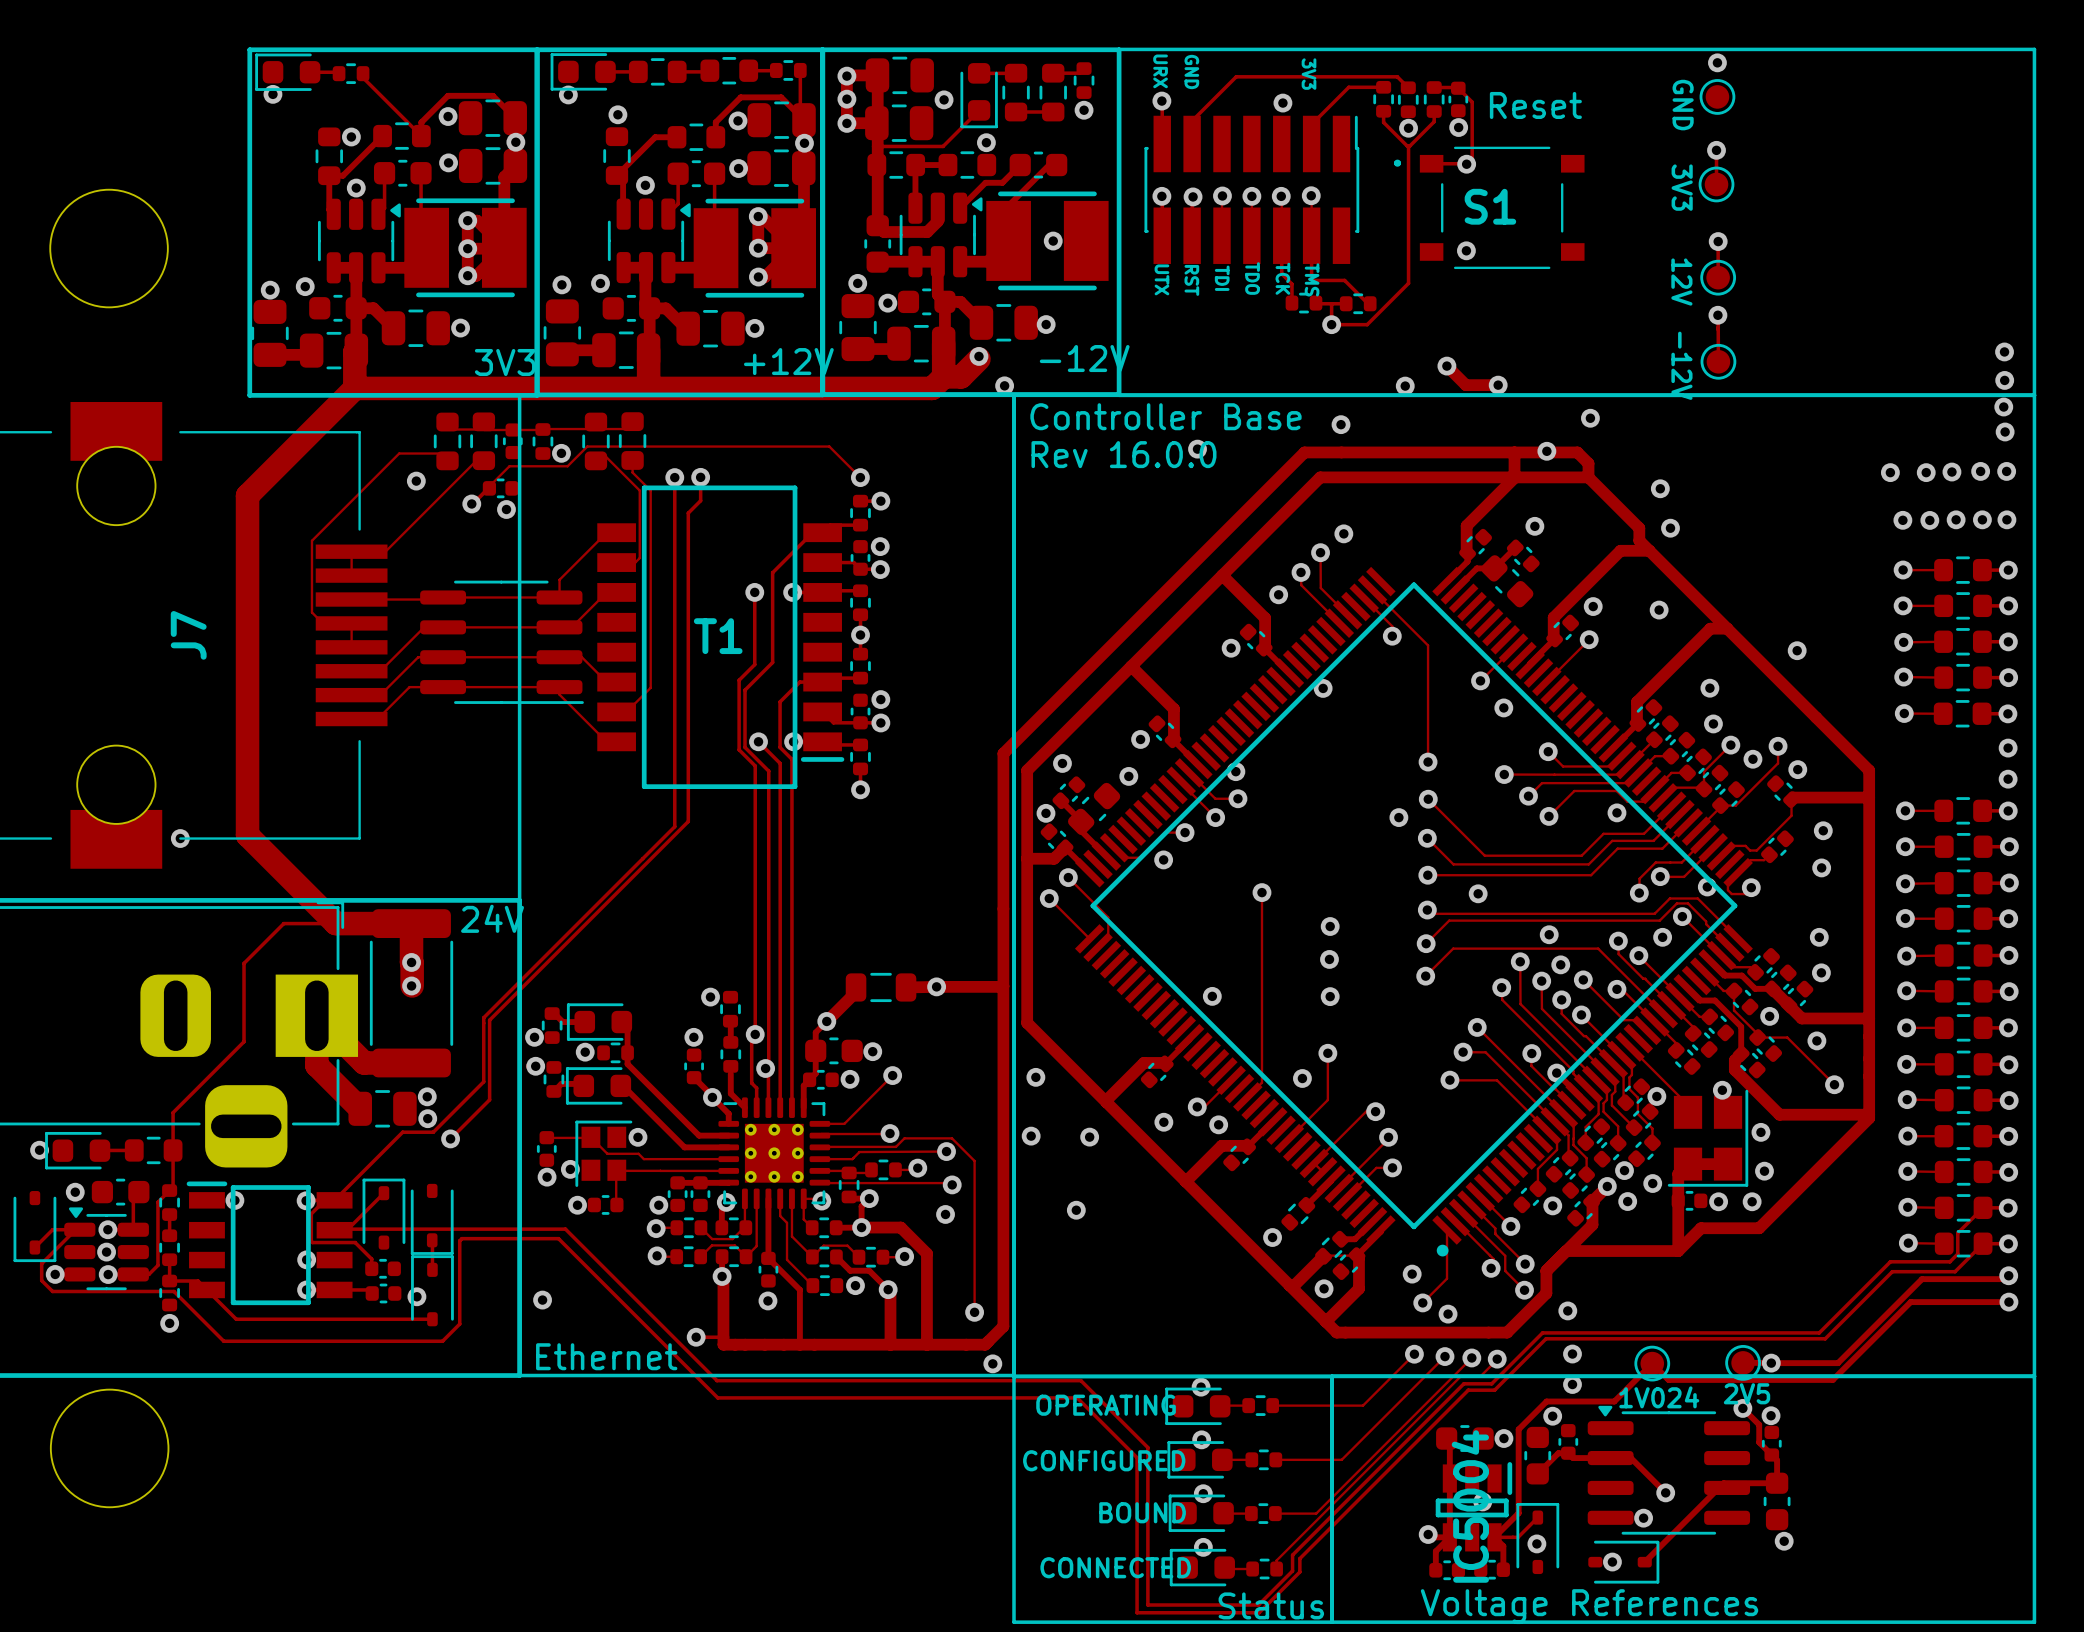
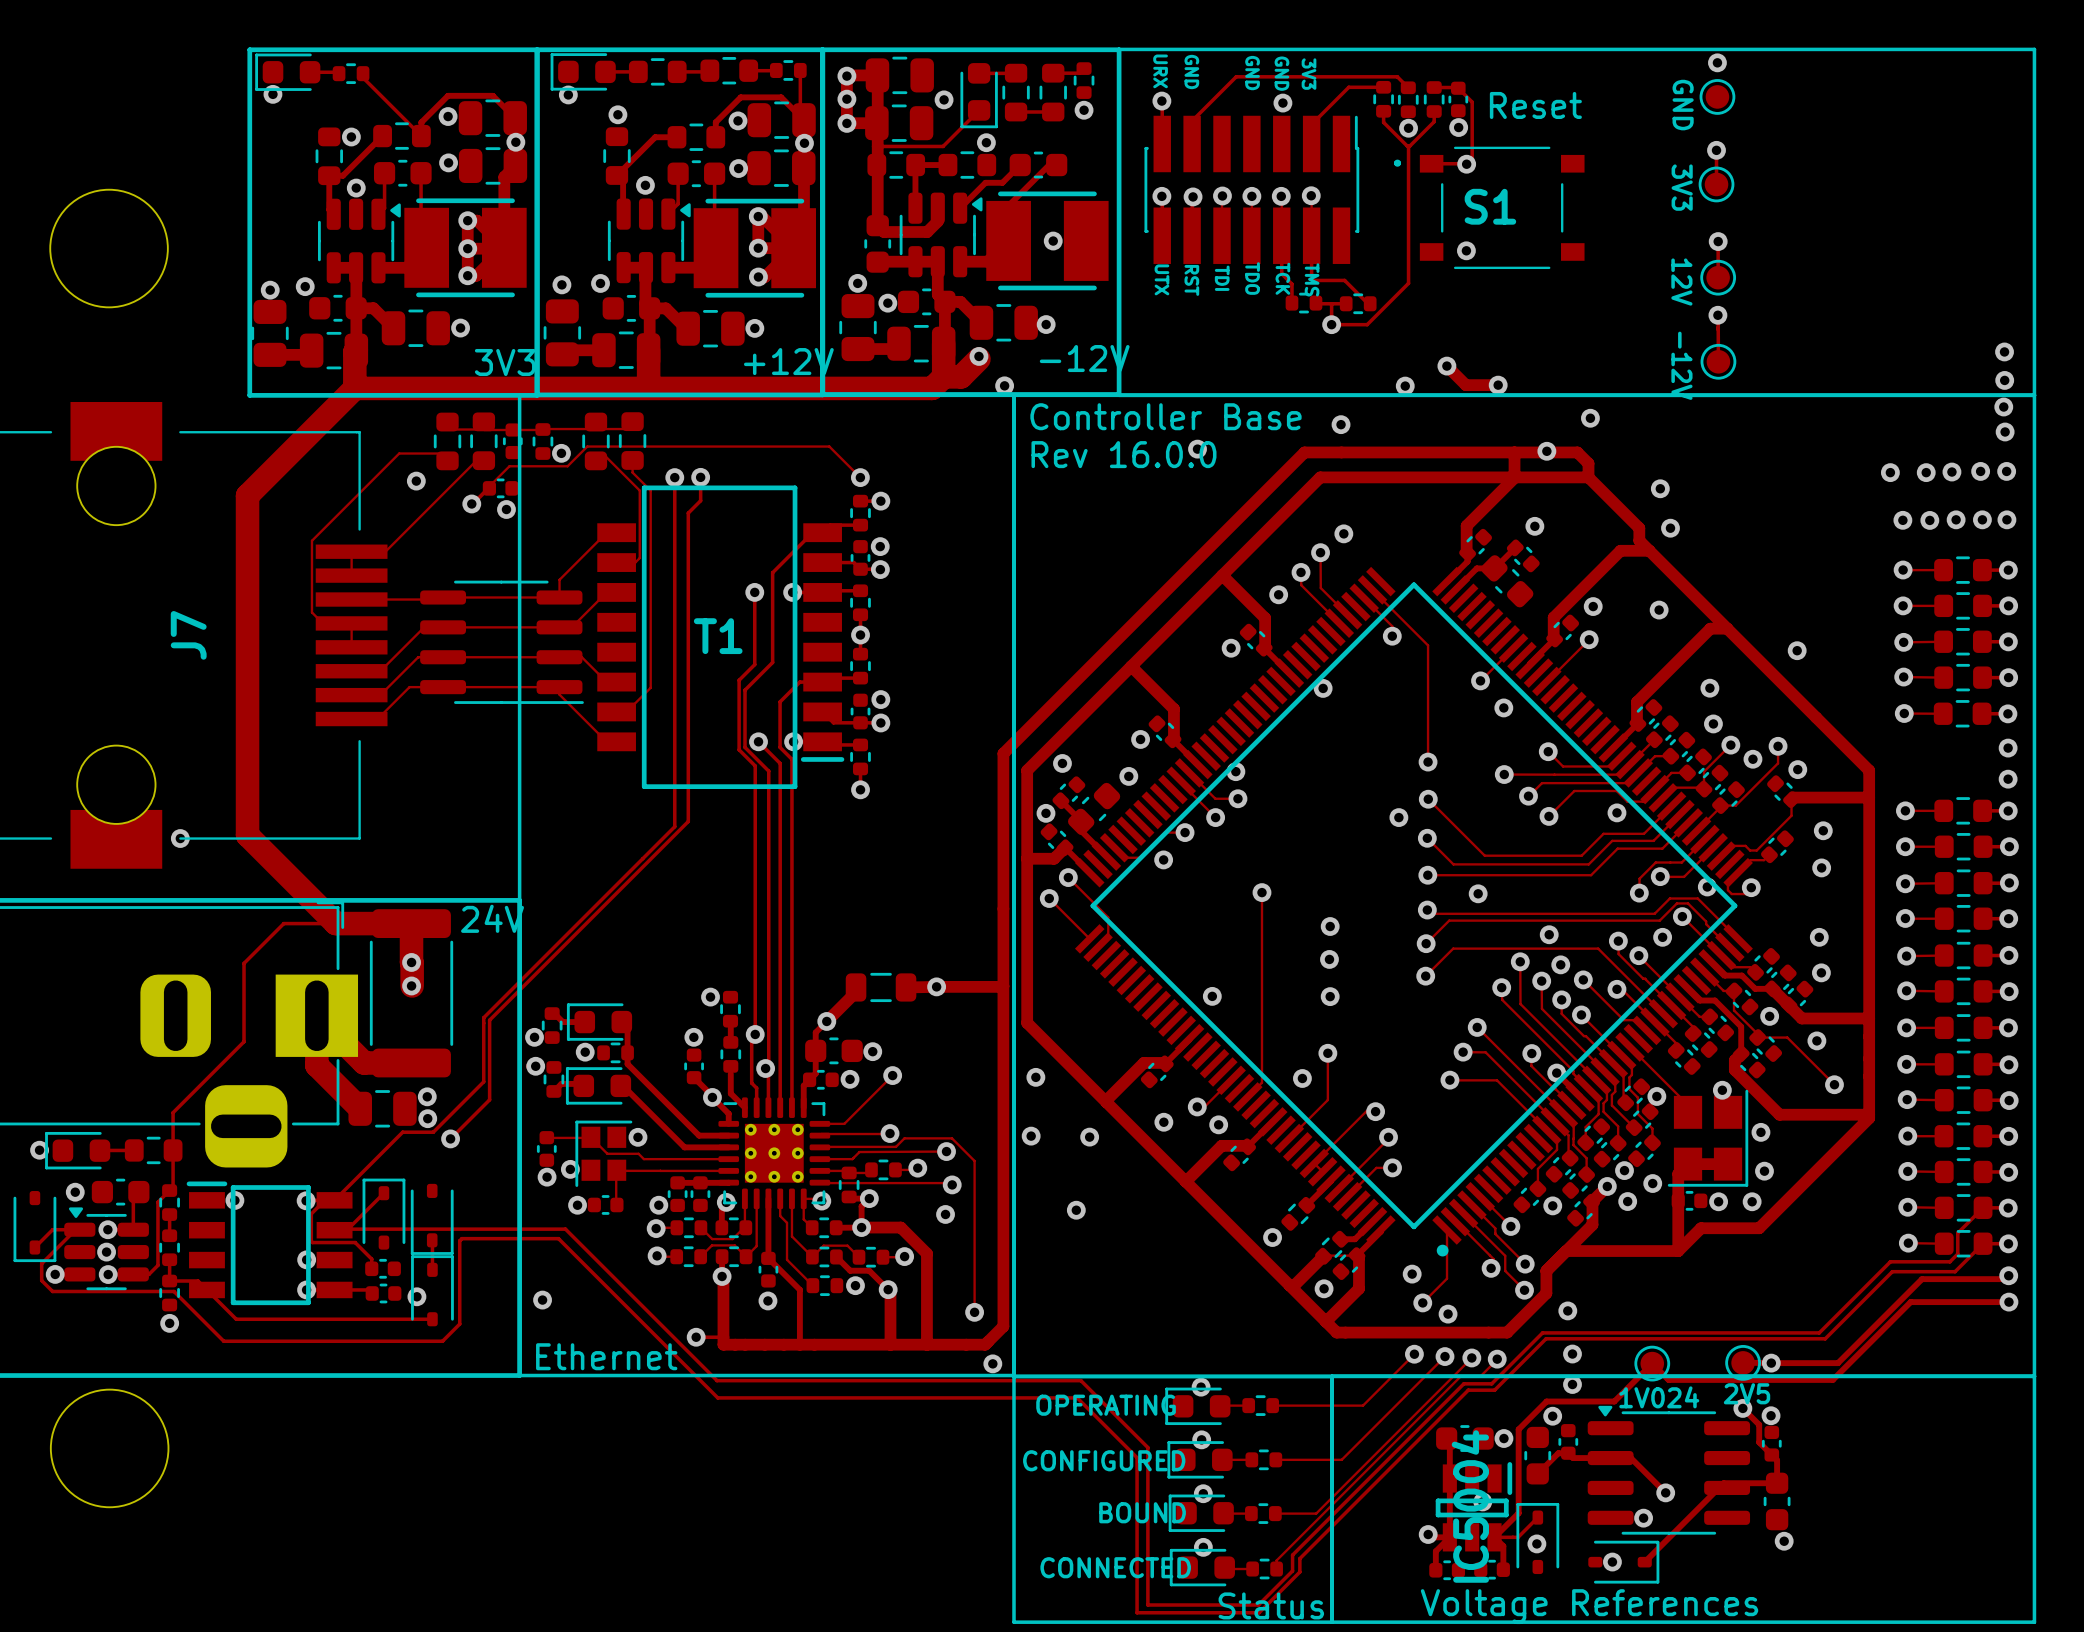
text: none -> GND (1252, 73)
text: none -> GND (1281, 73)

